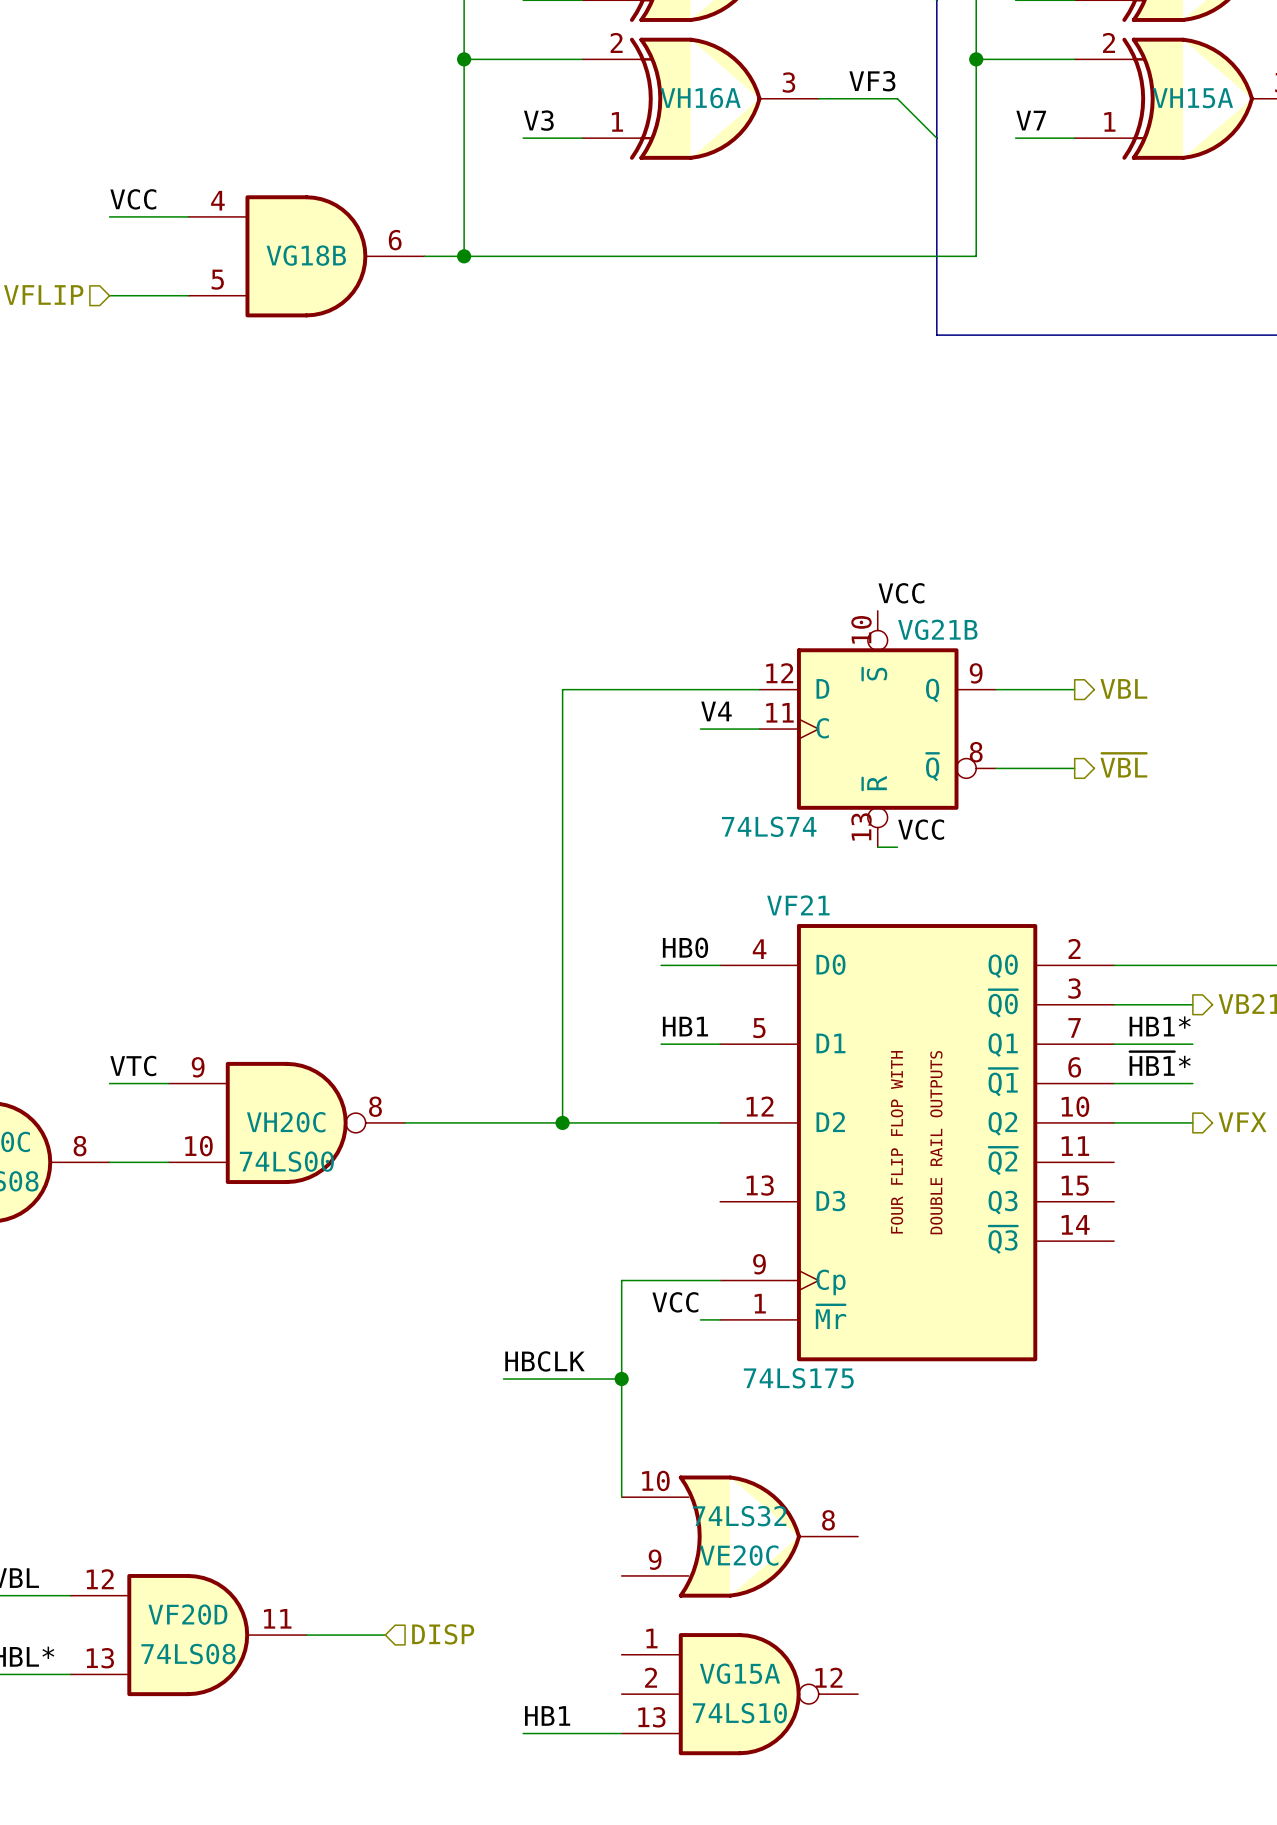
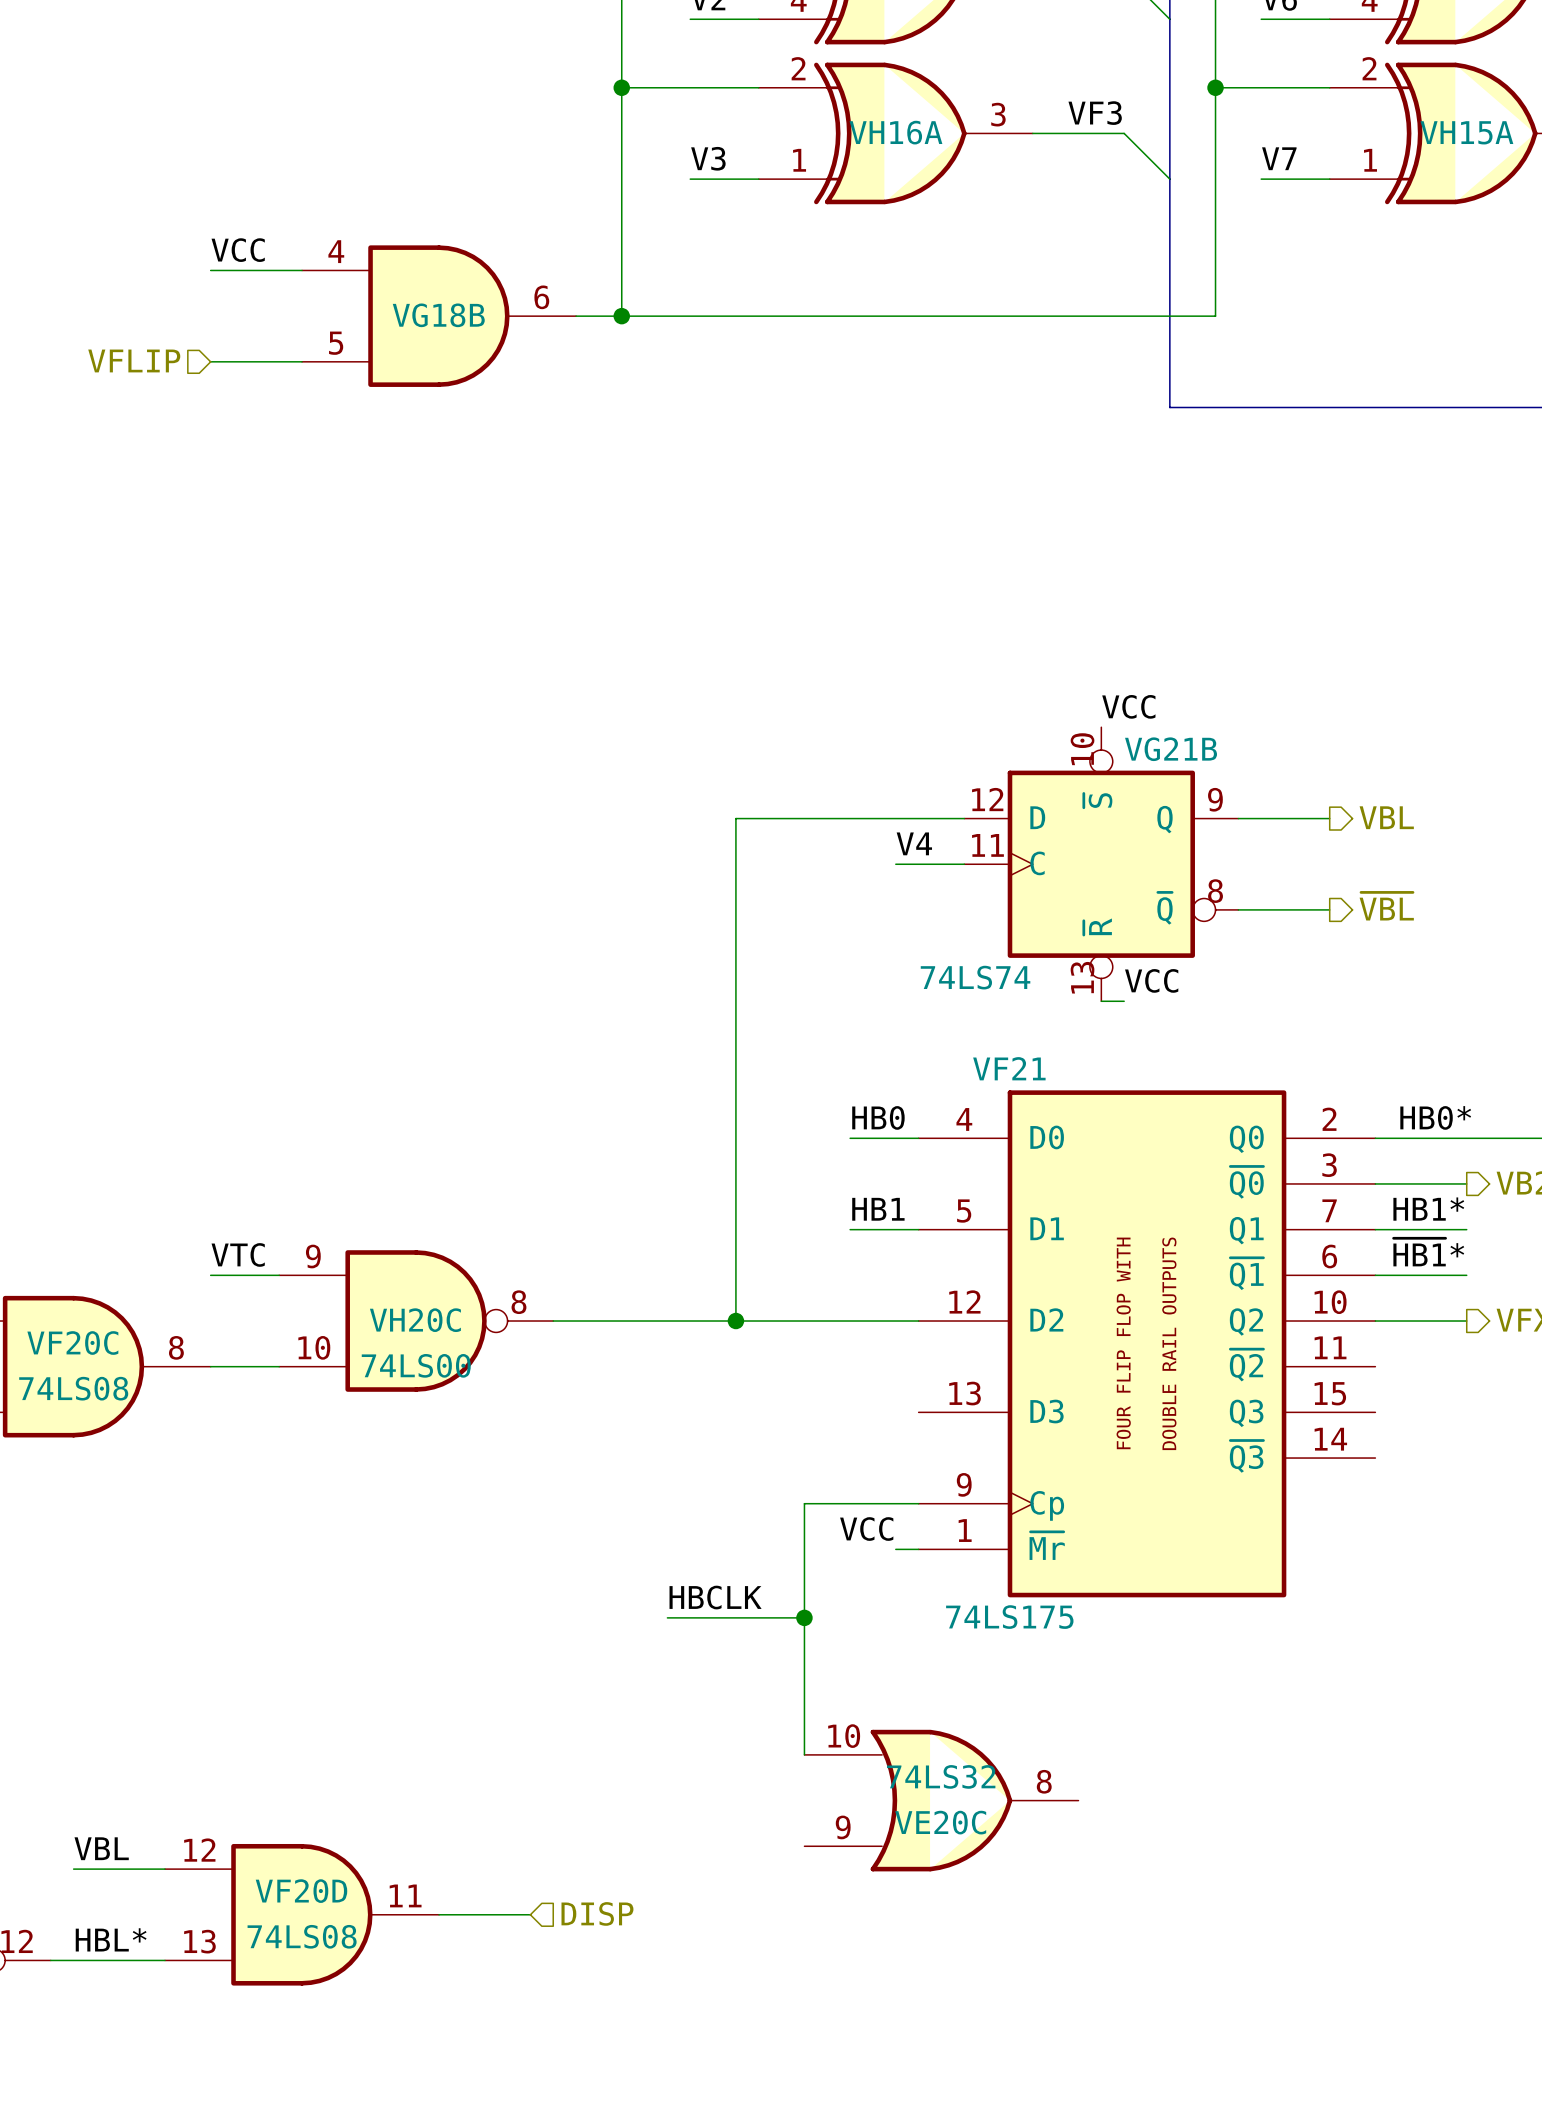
label: none -> HB0* (1435, 1117)
VG15A: 74LS10 (739, 1694) -> none
label: HB1 (547, 1715) -> none
wire: (523, 1733) (621, 1733) -> none

